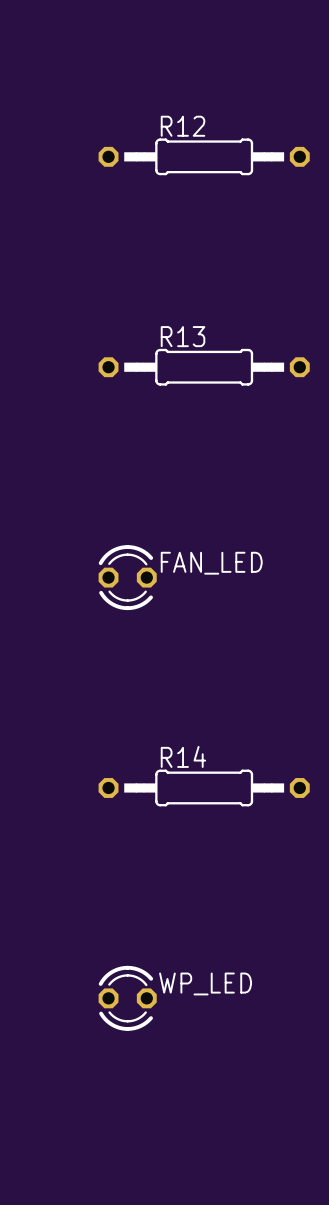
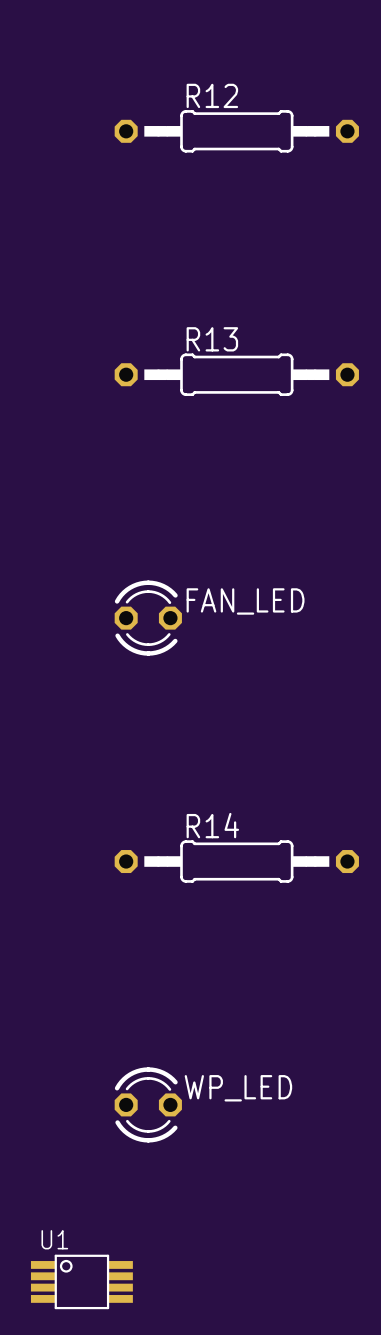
U1: none -> (81, 1281)

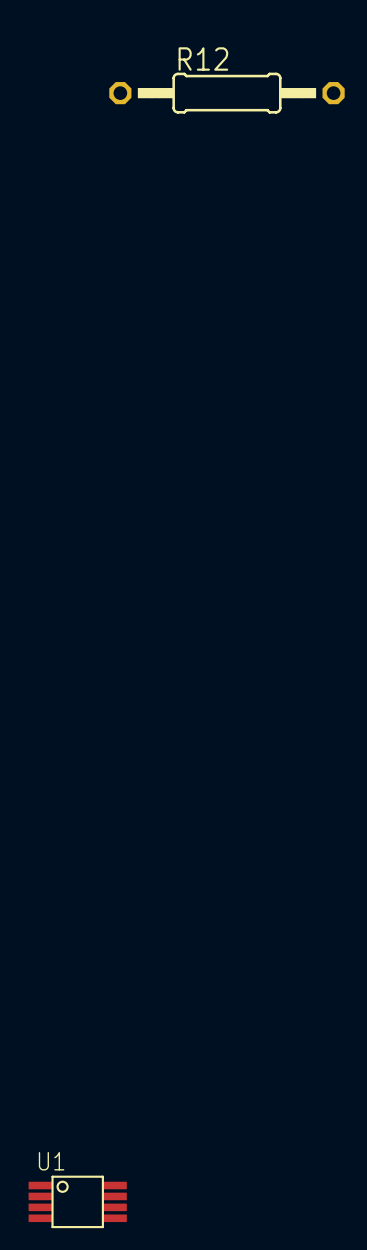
R13: (236, 374) -> none
FAN_LED: (148, 618) -> none
R14: (236, 861) -> none
WP_LED: (148, 1104) -> none

